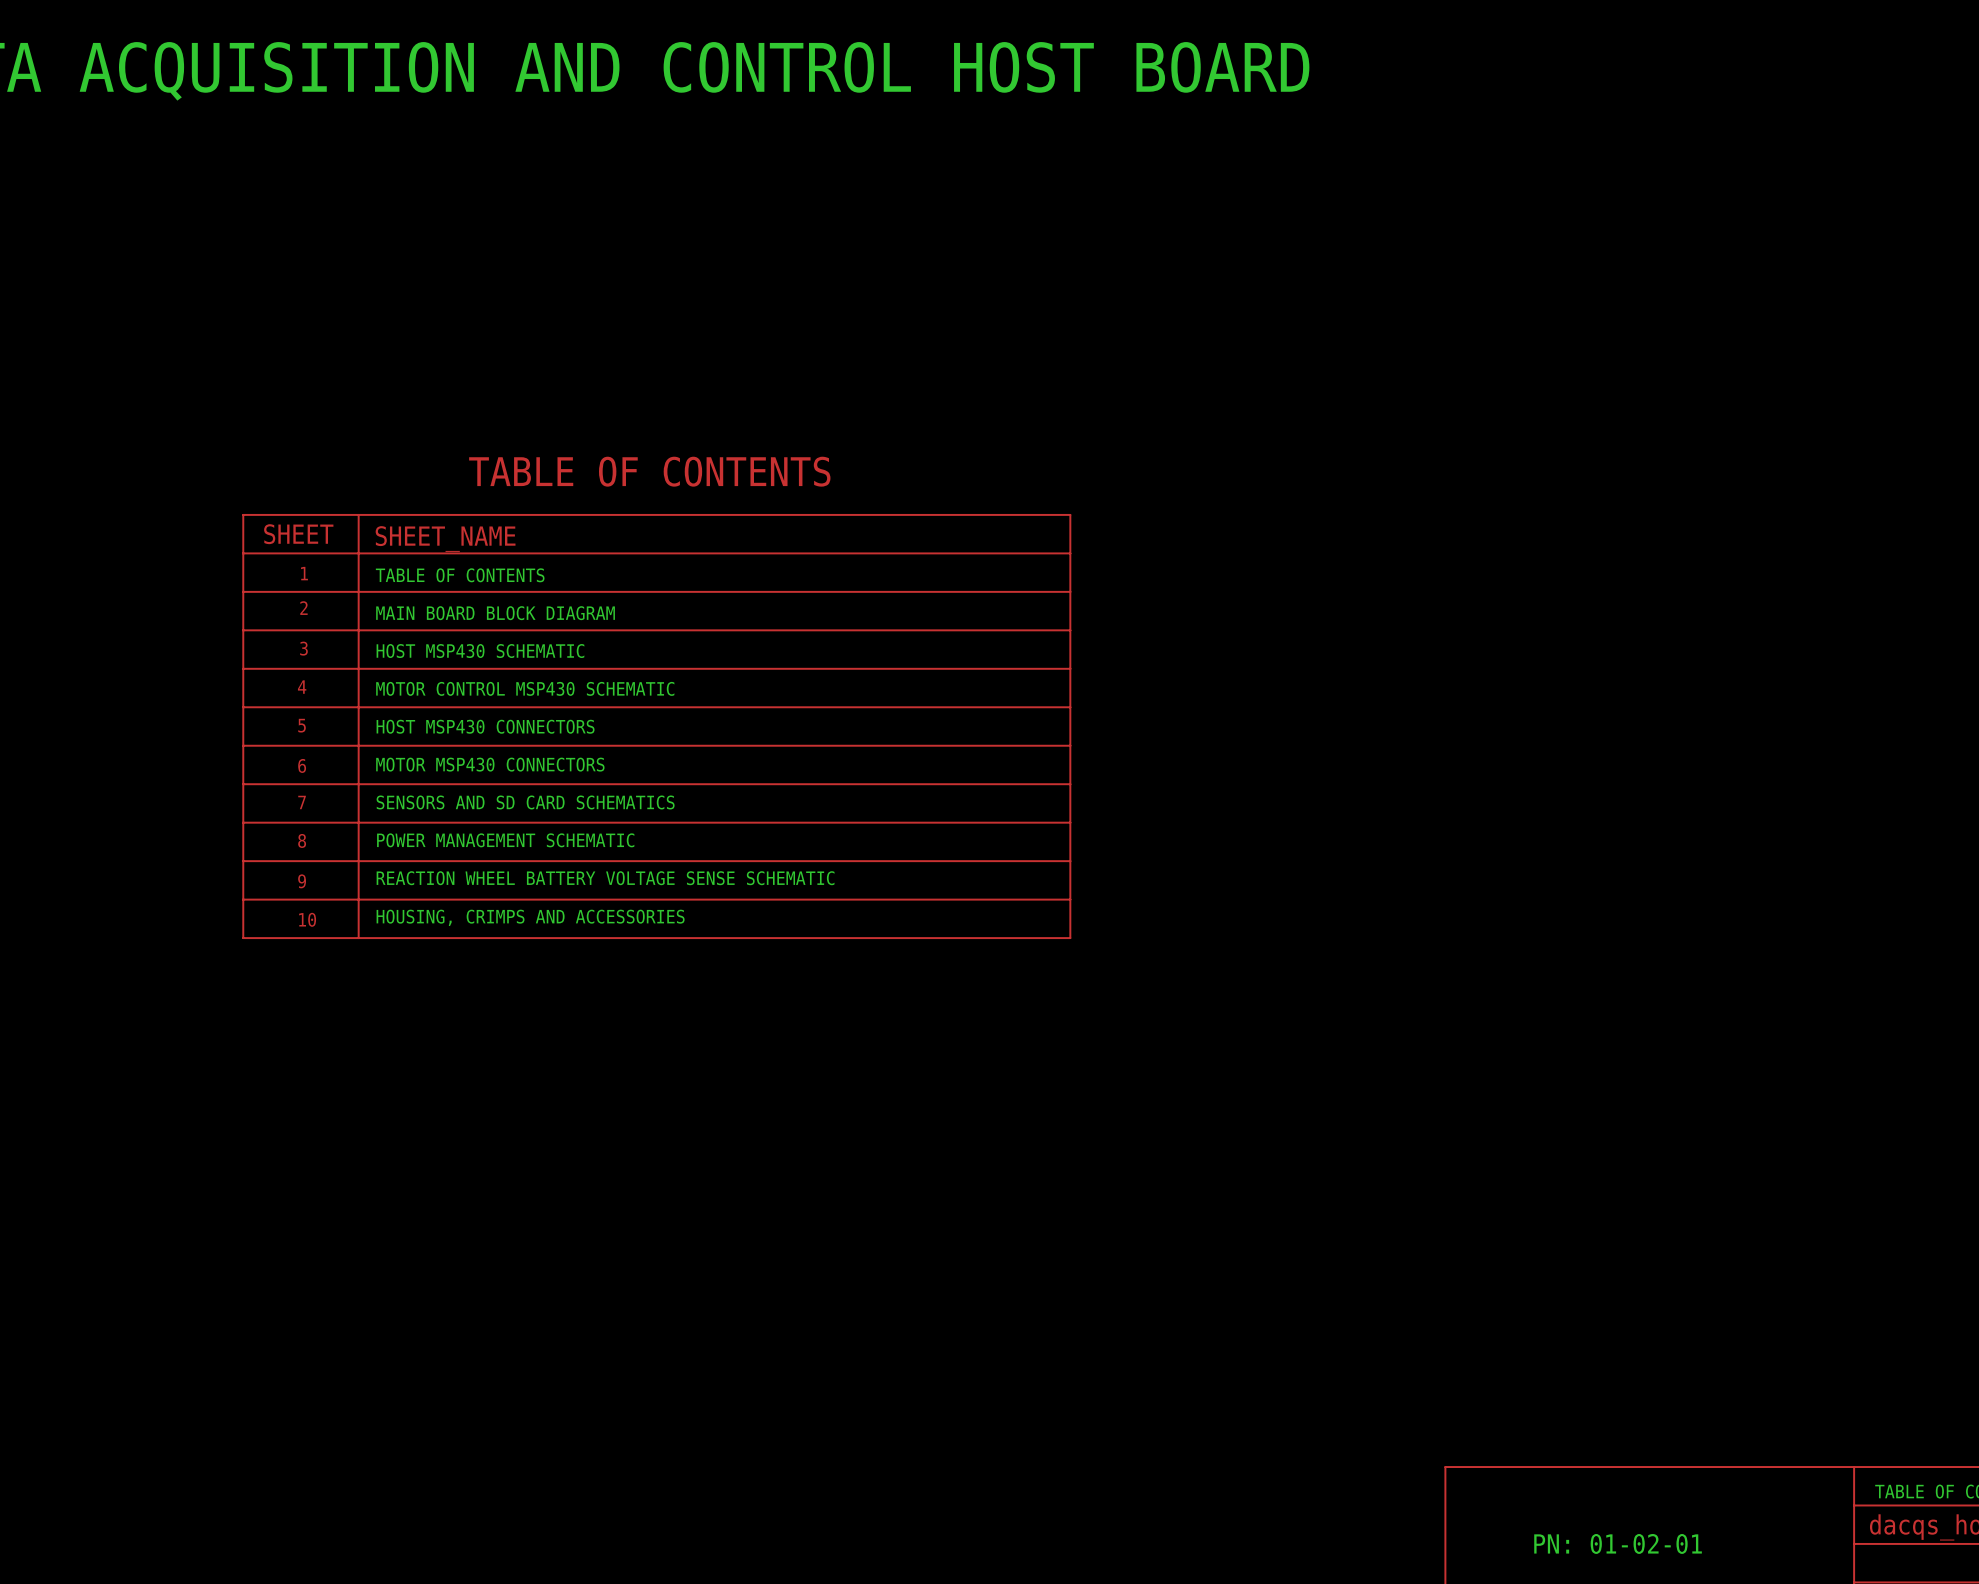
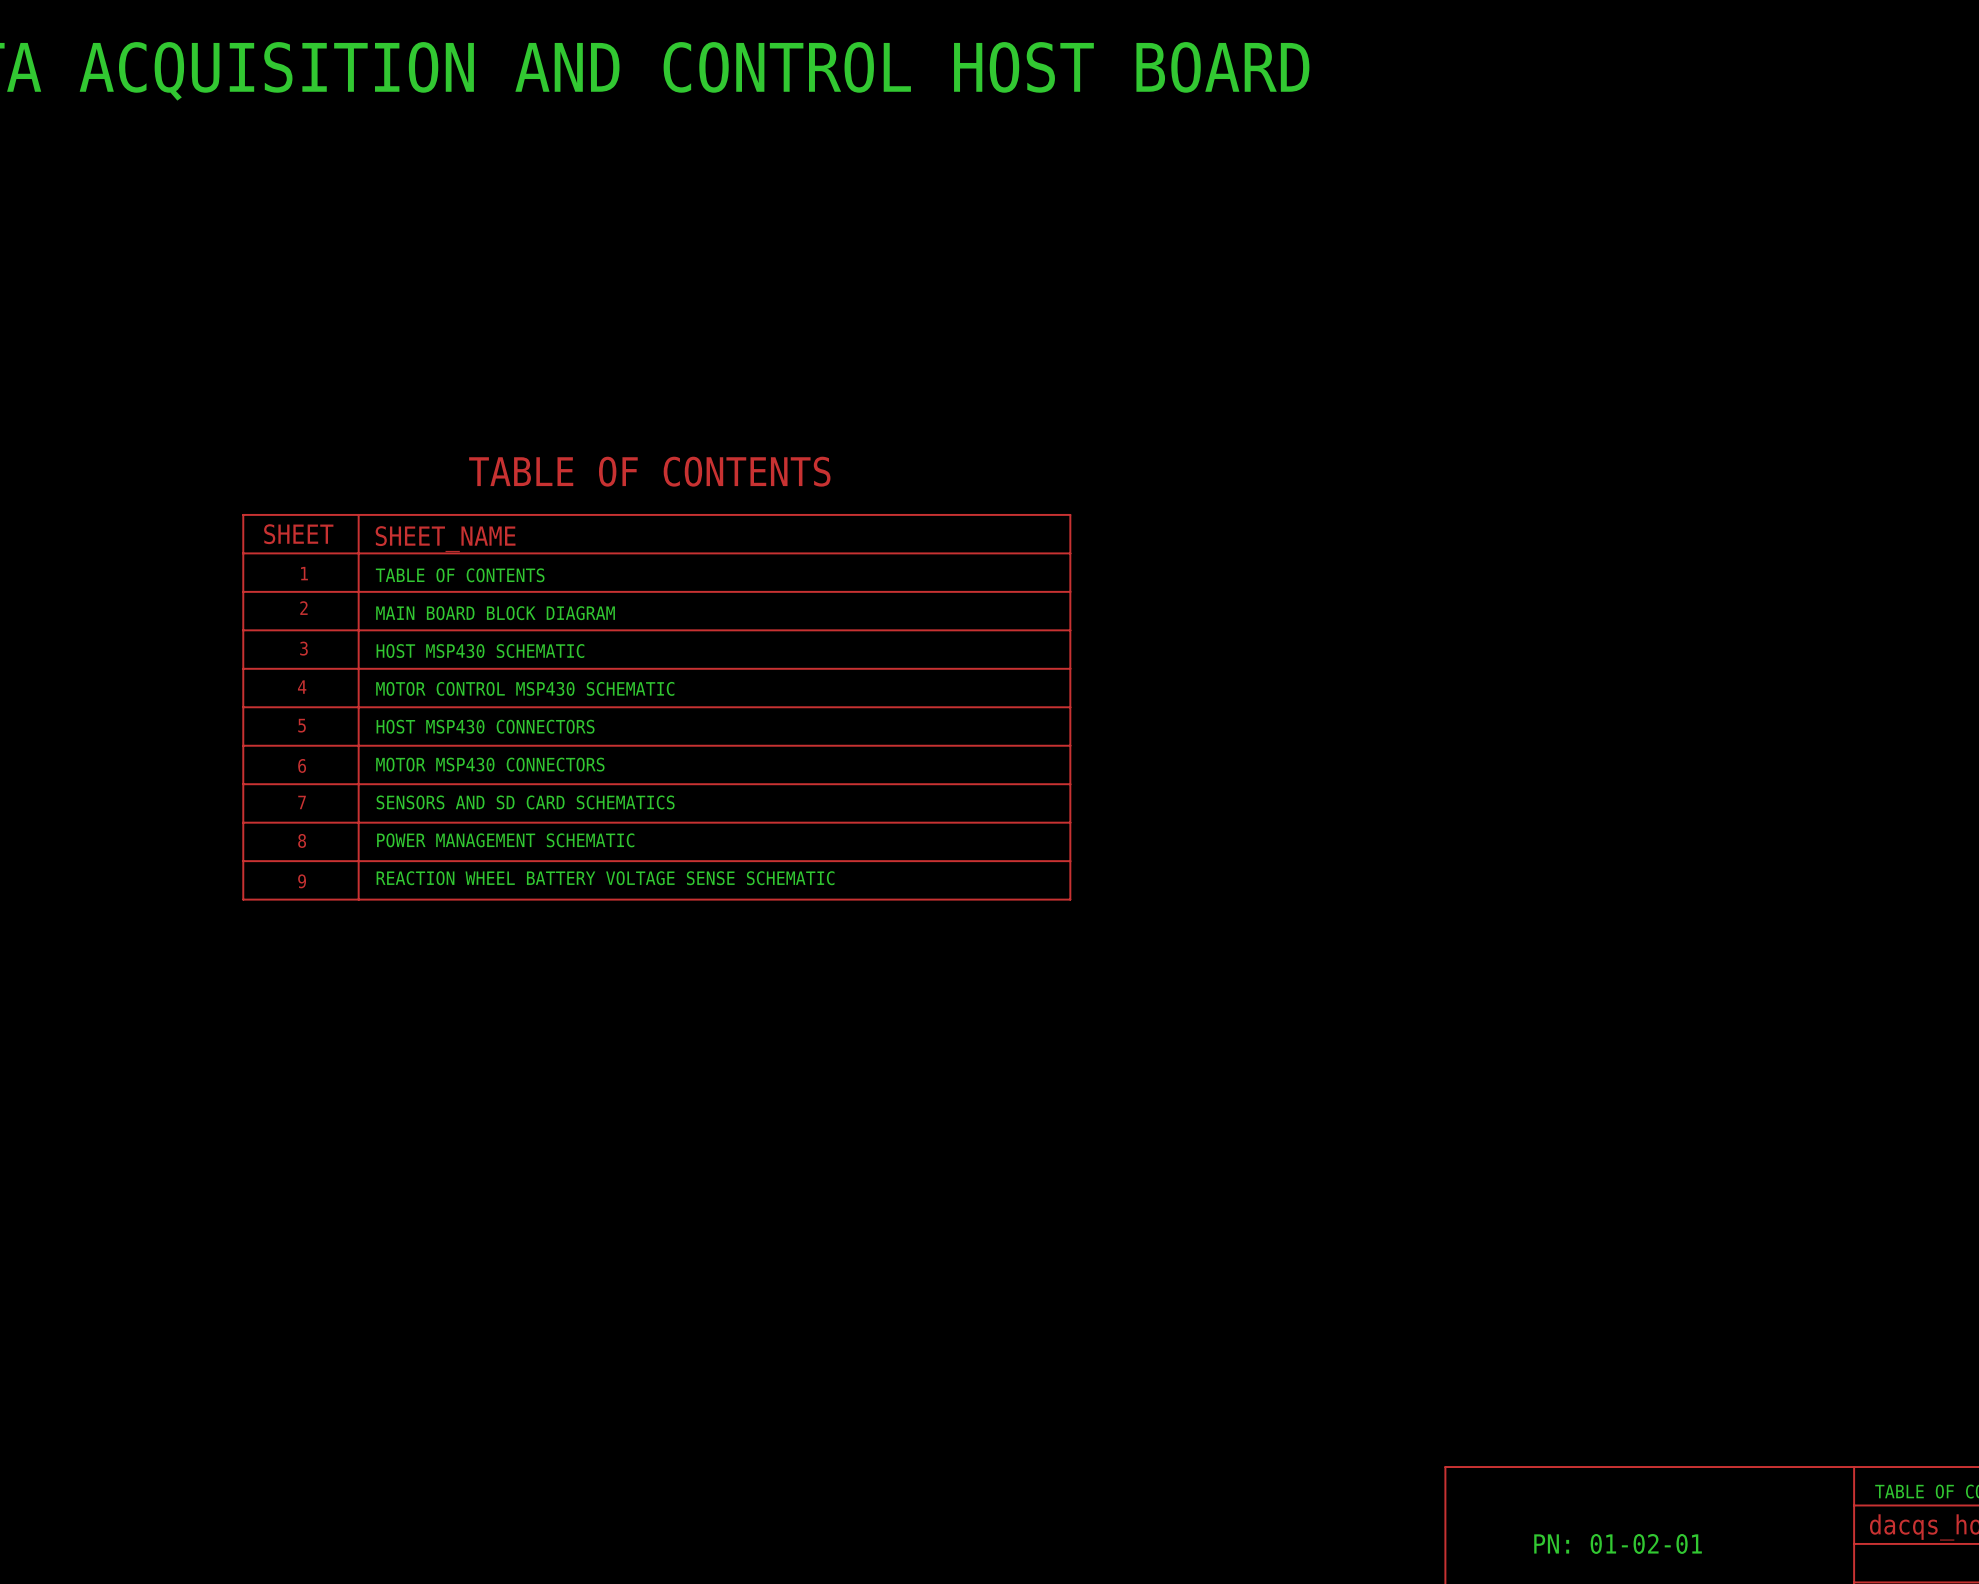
part: none -> (656, 707)
part: (656, 726) -> none
text: HOUSING, CRIMPS AND ACCESSORIES (530, 917) -> none

